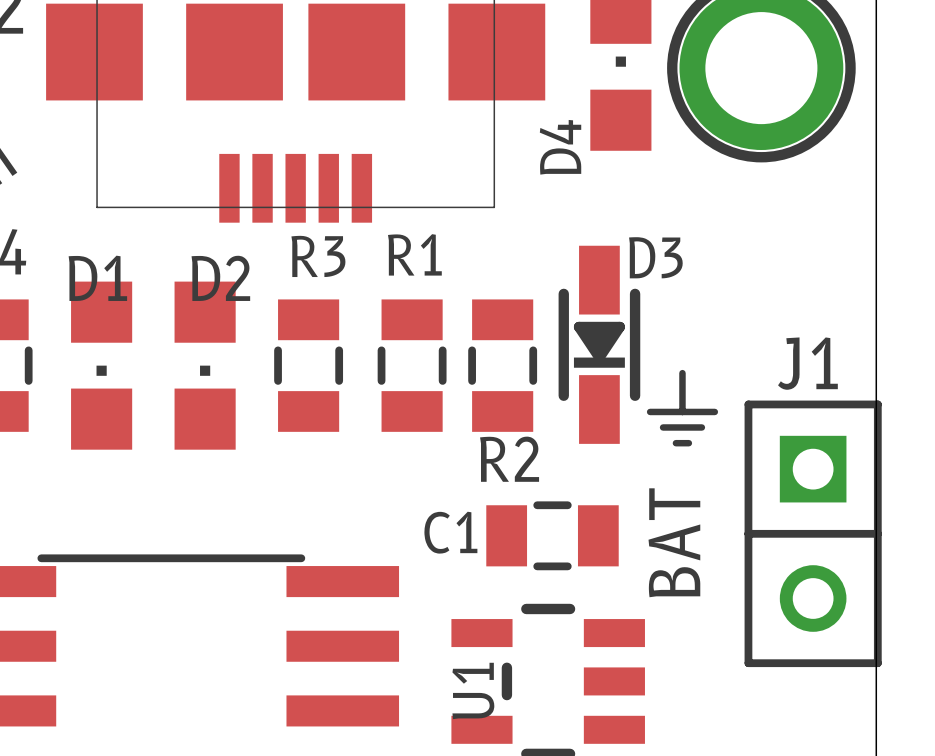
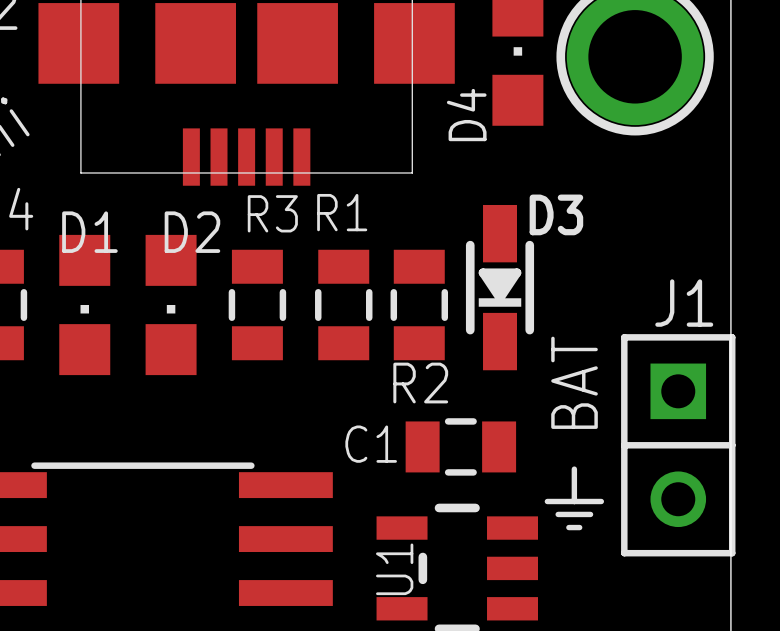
line: (682, 373) (682, 411) -> (574, 469) (574, 501)
line: (650, 411) (714, 411) -> (547, 501) (601, 501)
line: (663, 427) (701, 427) -> (558, 514) (590, 514)
line: (675, 443) (688, 443) -> (568, 527) (579, 527)
text position: BAT (674, 542) -> BAT (574, 382)

